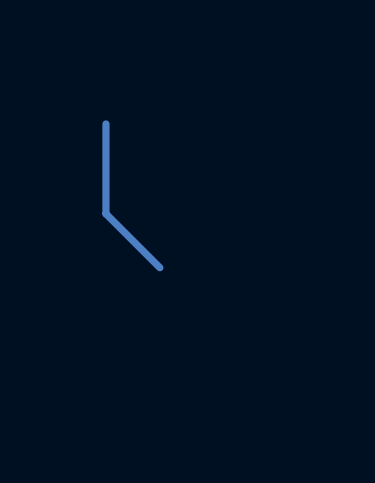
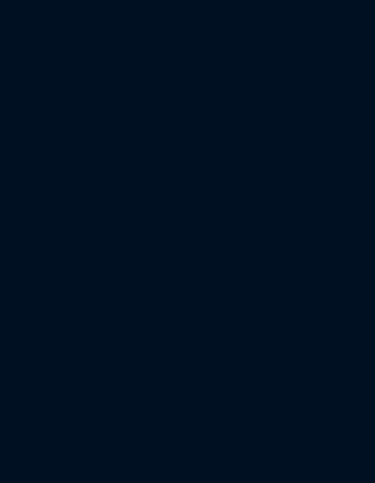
bottom track: (105, 123) (105, 213) (159, 267) -> none

